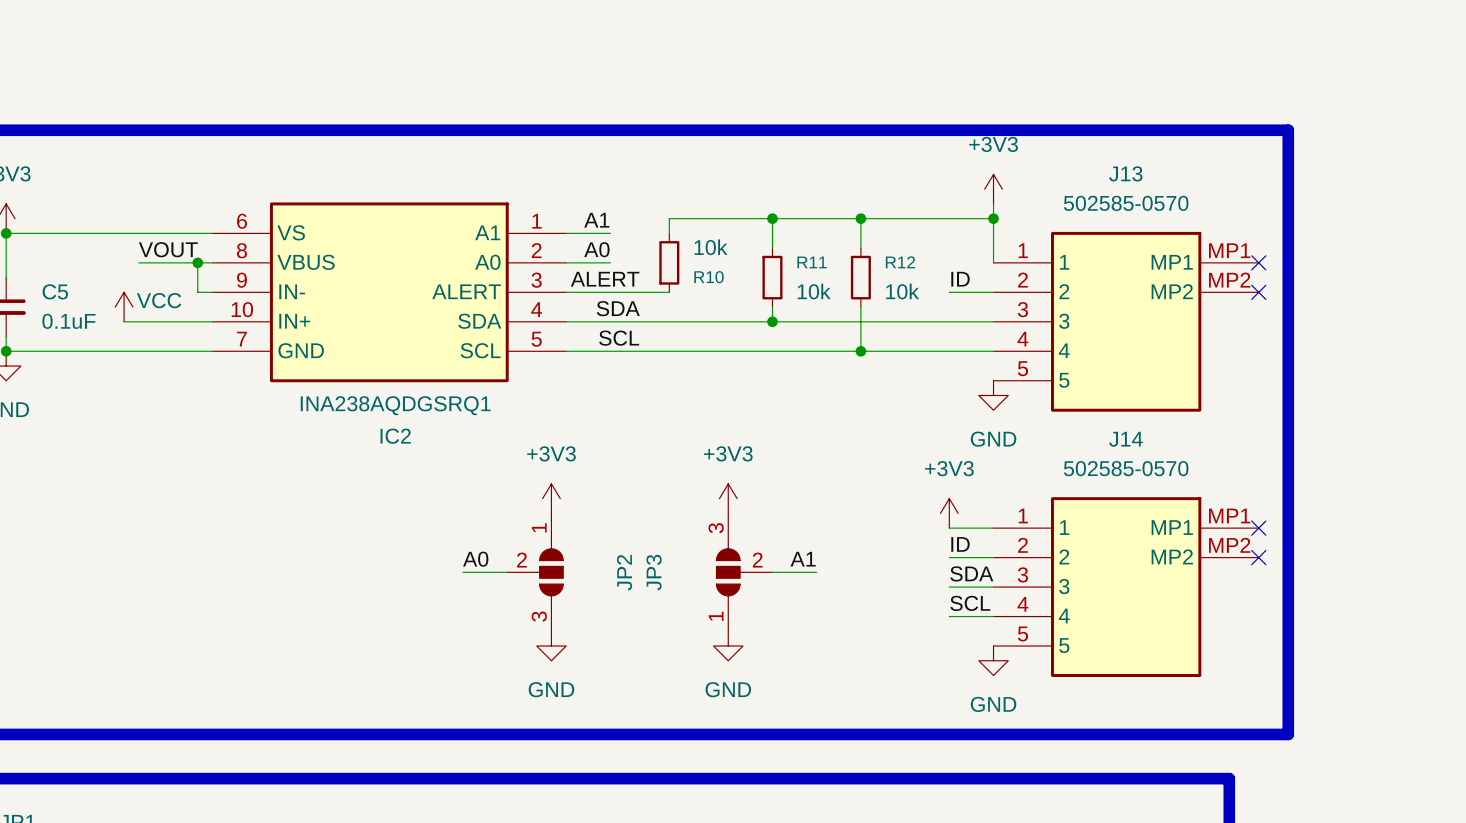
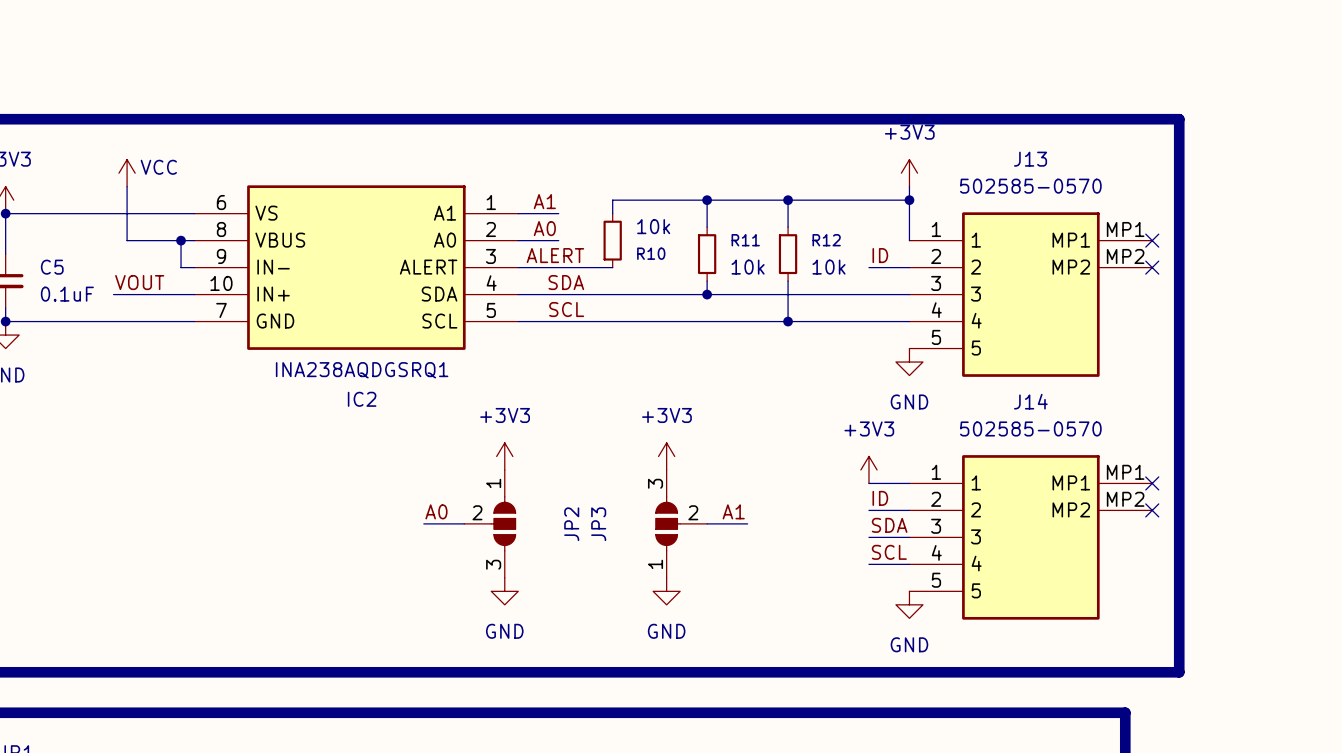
wire: none -> (127, 186) (127, 240)
label position: VOUT (168, 249) -> VOUT (139, 282)
power symbol position: VCC (124, 307) -> VCC (127, 173)

